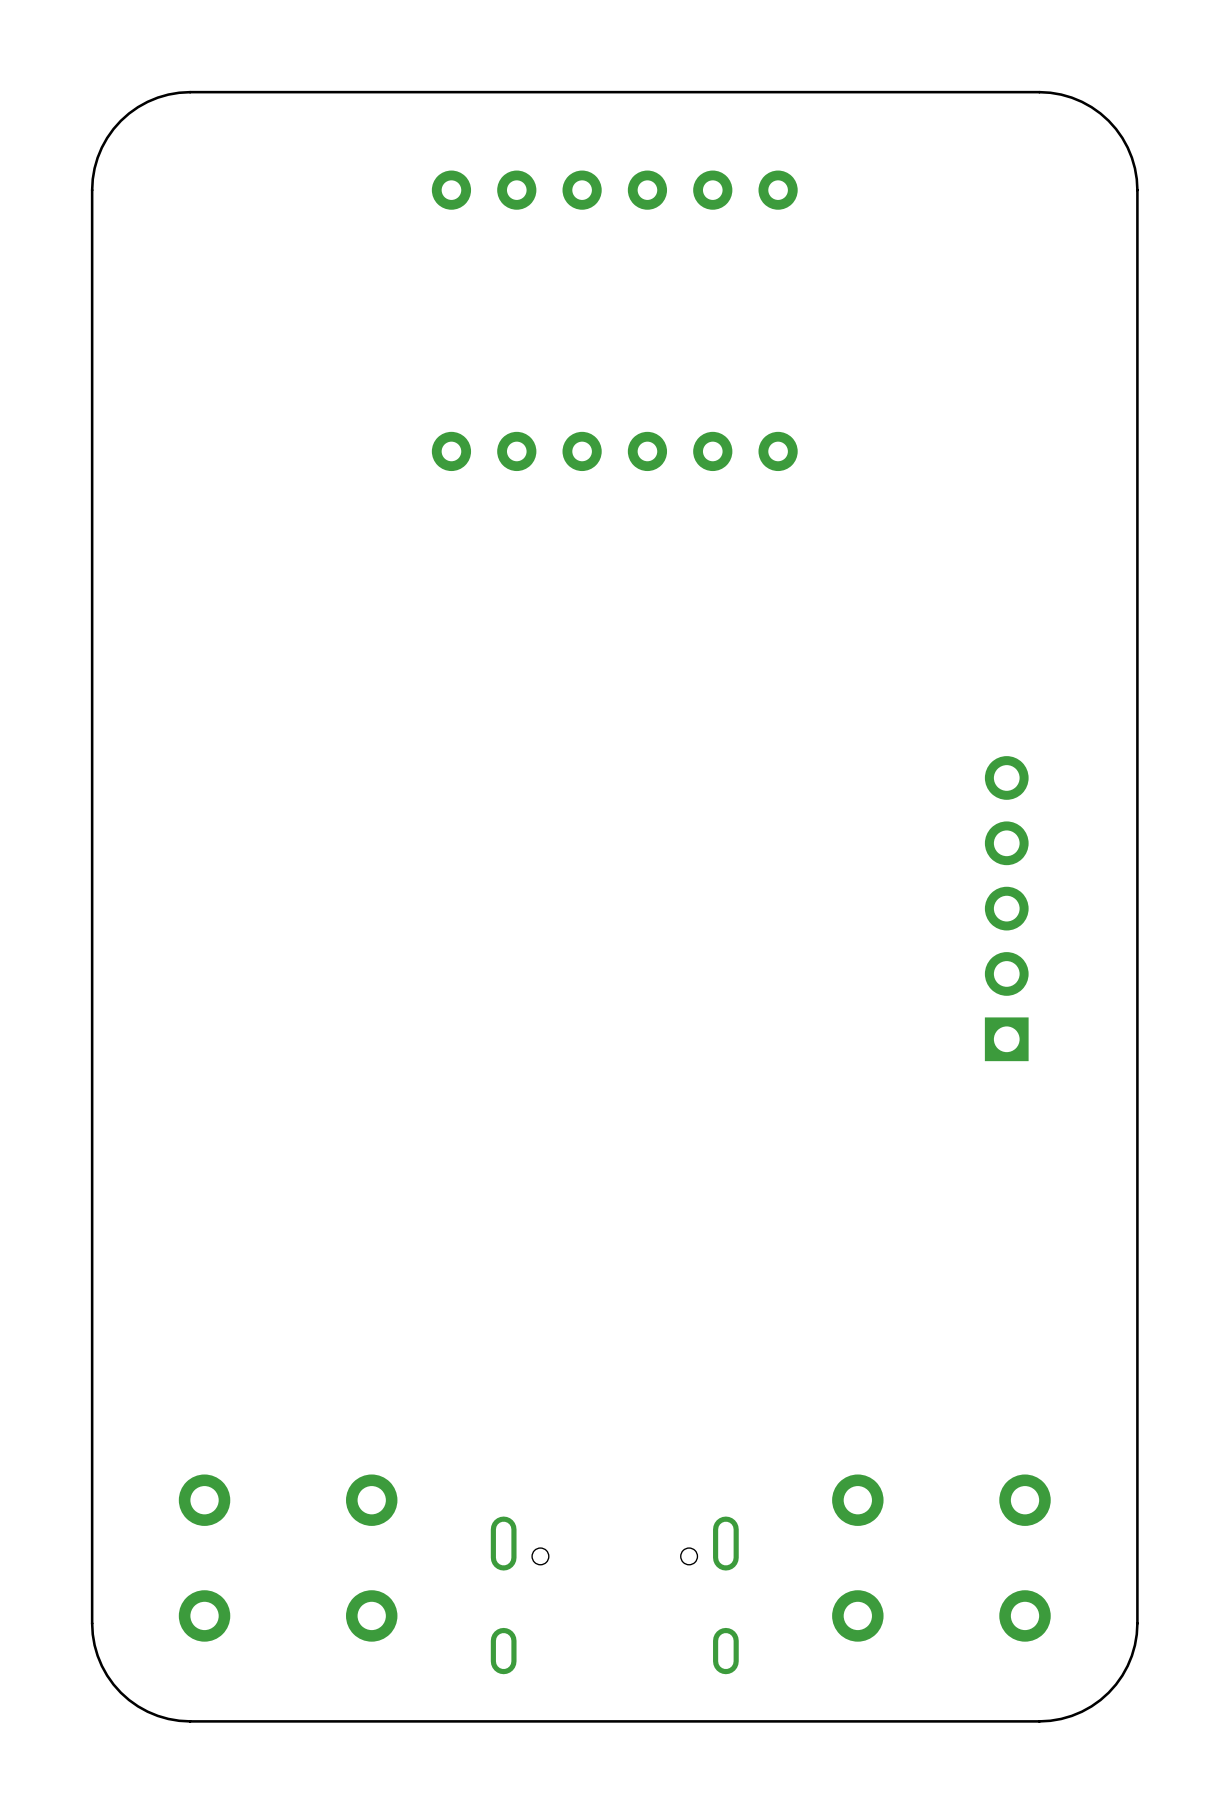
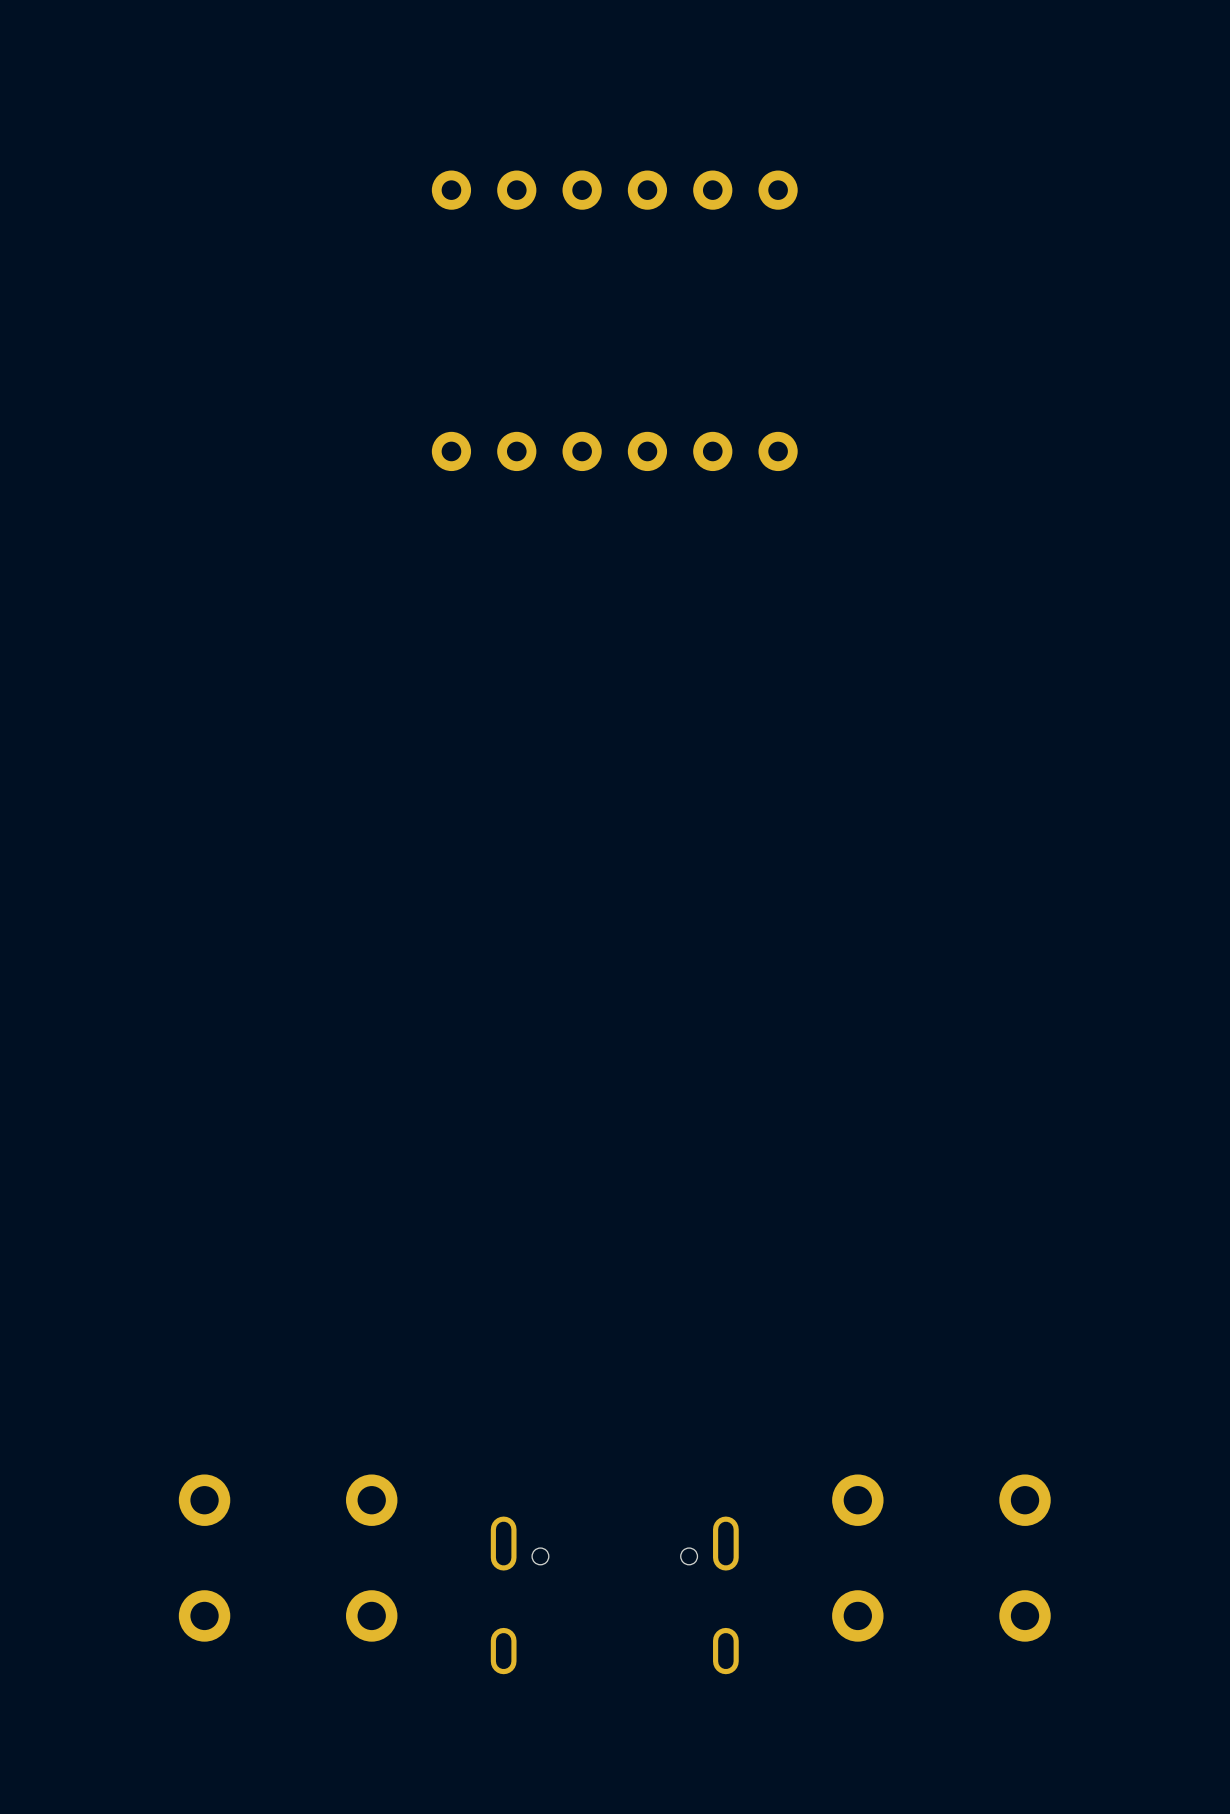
board edge: (1039, 92) (190, 92) (168, 94) (138, 107) (120, 120) (107, 138) (97, 157) (92, 190) (92, 1623) (94, 1645) (101, 1665) (113, 1684) (138, 1706) (157, 1715) (190, 1721) (1039, 1721) (1061, 1718) (1081, 1711) (1100, 1700) (1122, 1675) (1134, 1645) (1137, 1623) (1137, 190) (1131, 157) (1122, 138) (1108, 120) (1081, 101) (1061, 94) (1039, 92) -> none
part: (1006, 908) -> none

